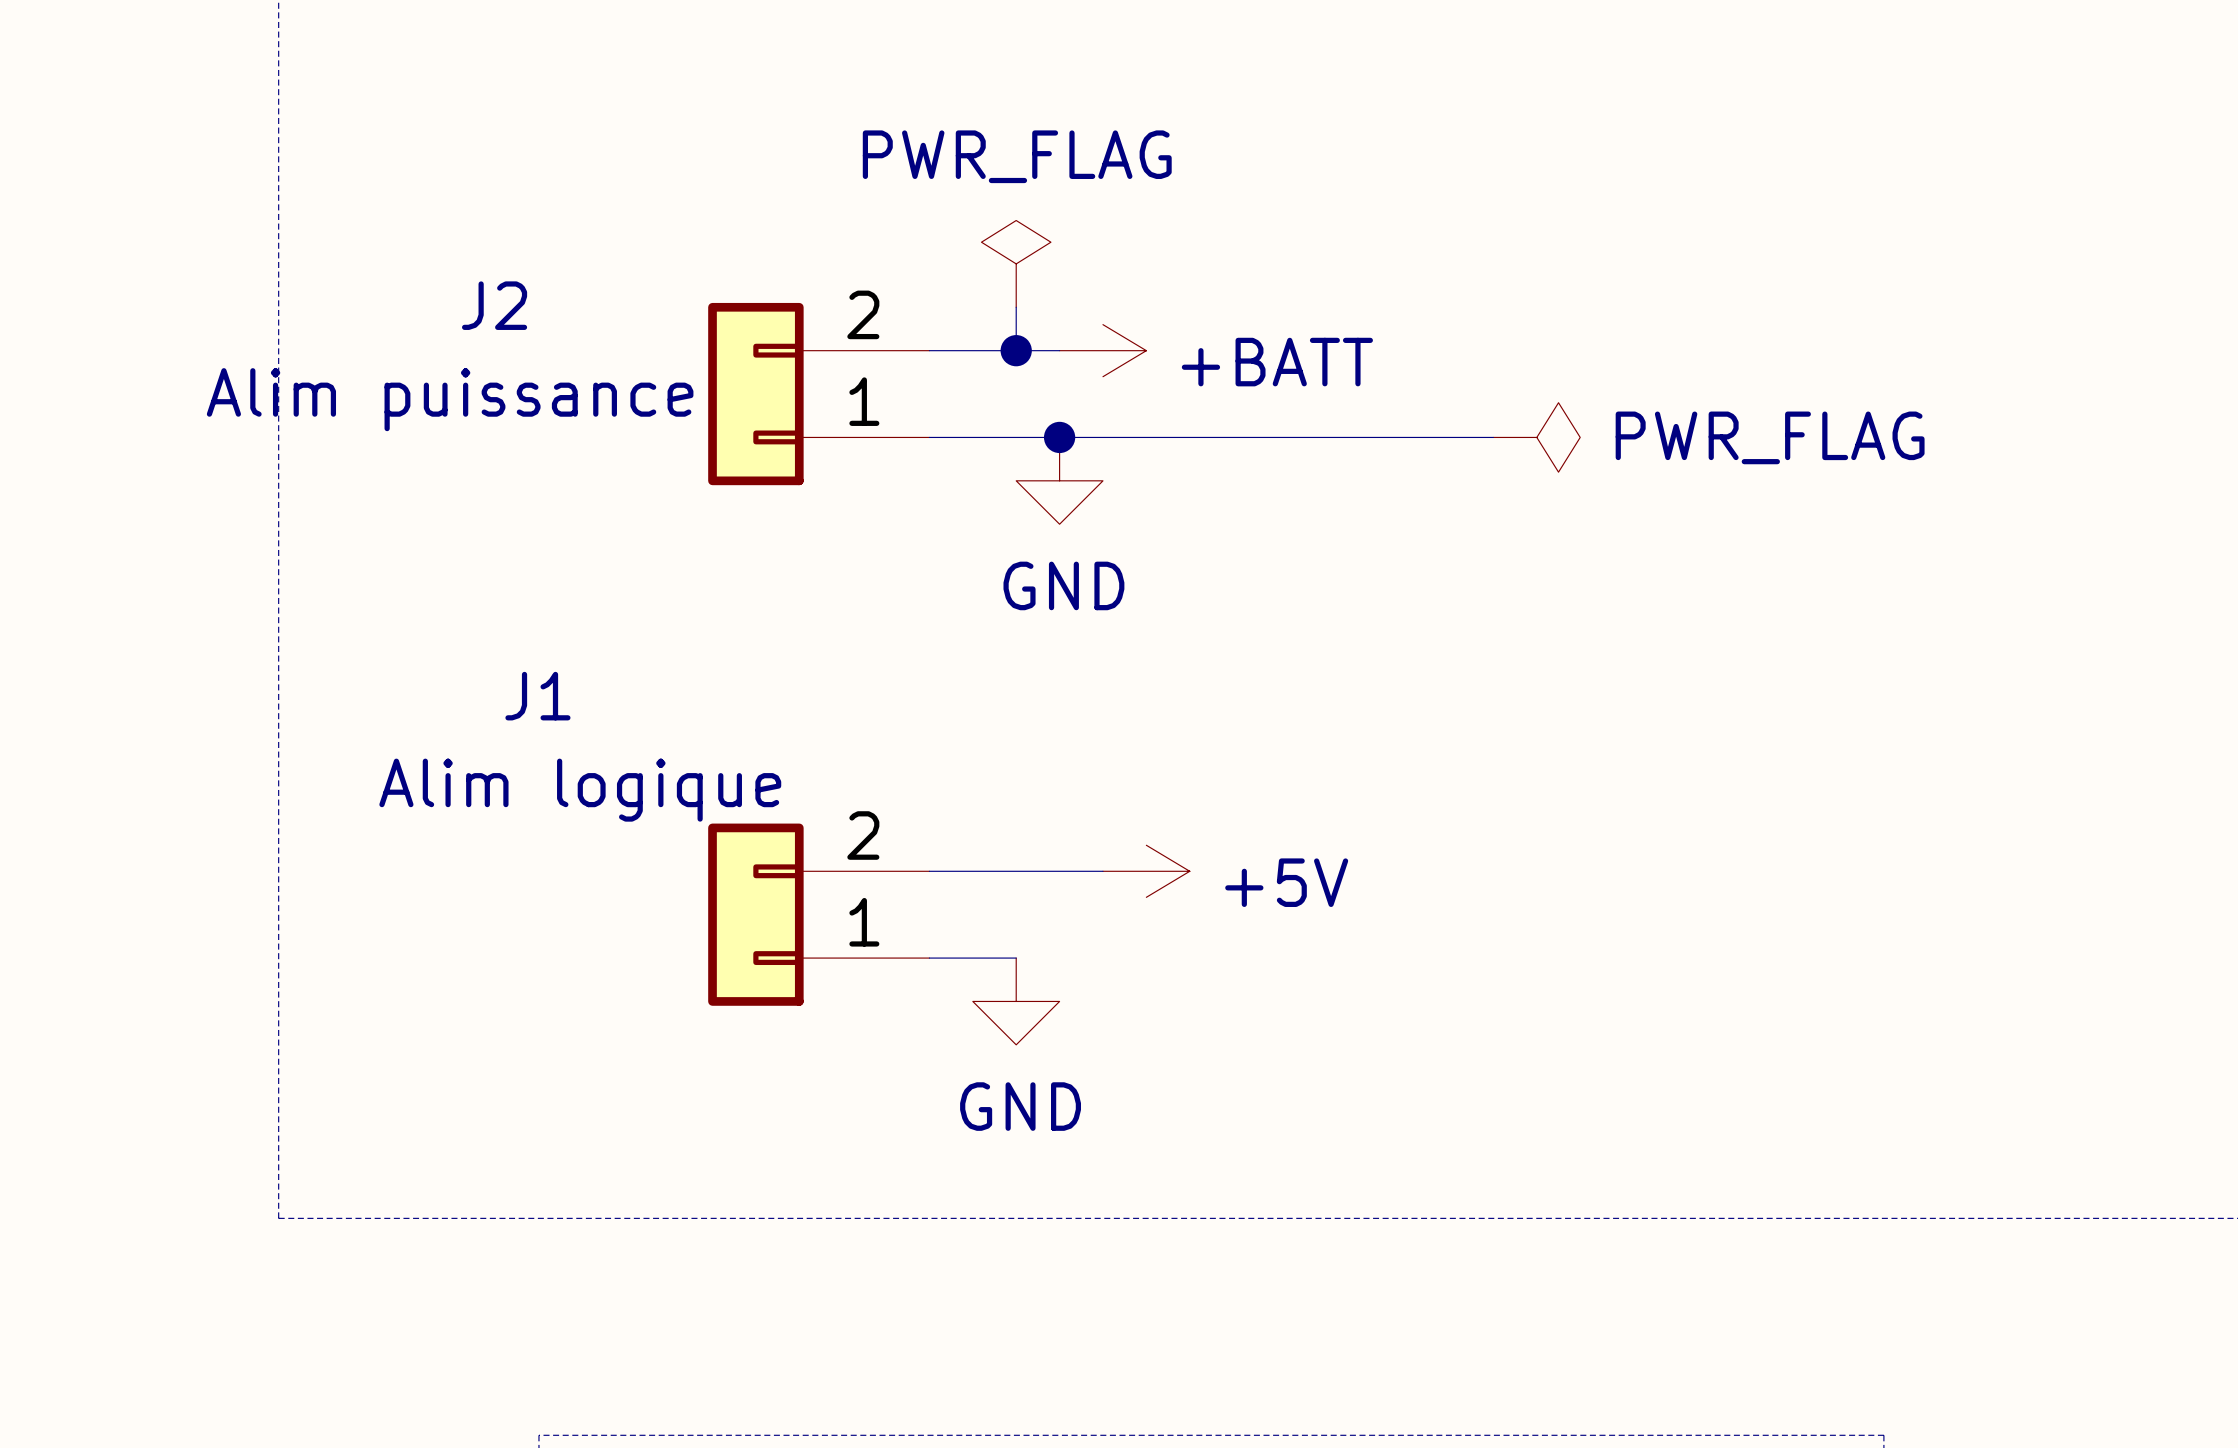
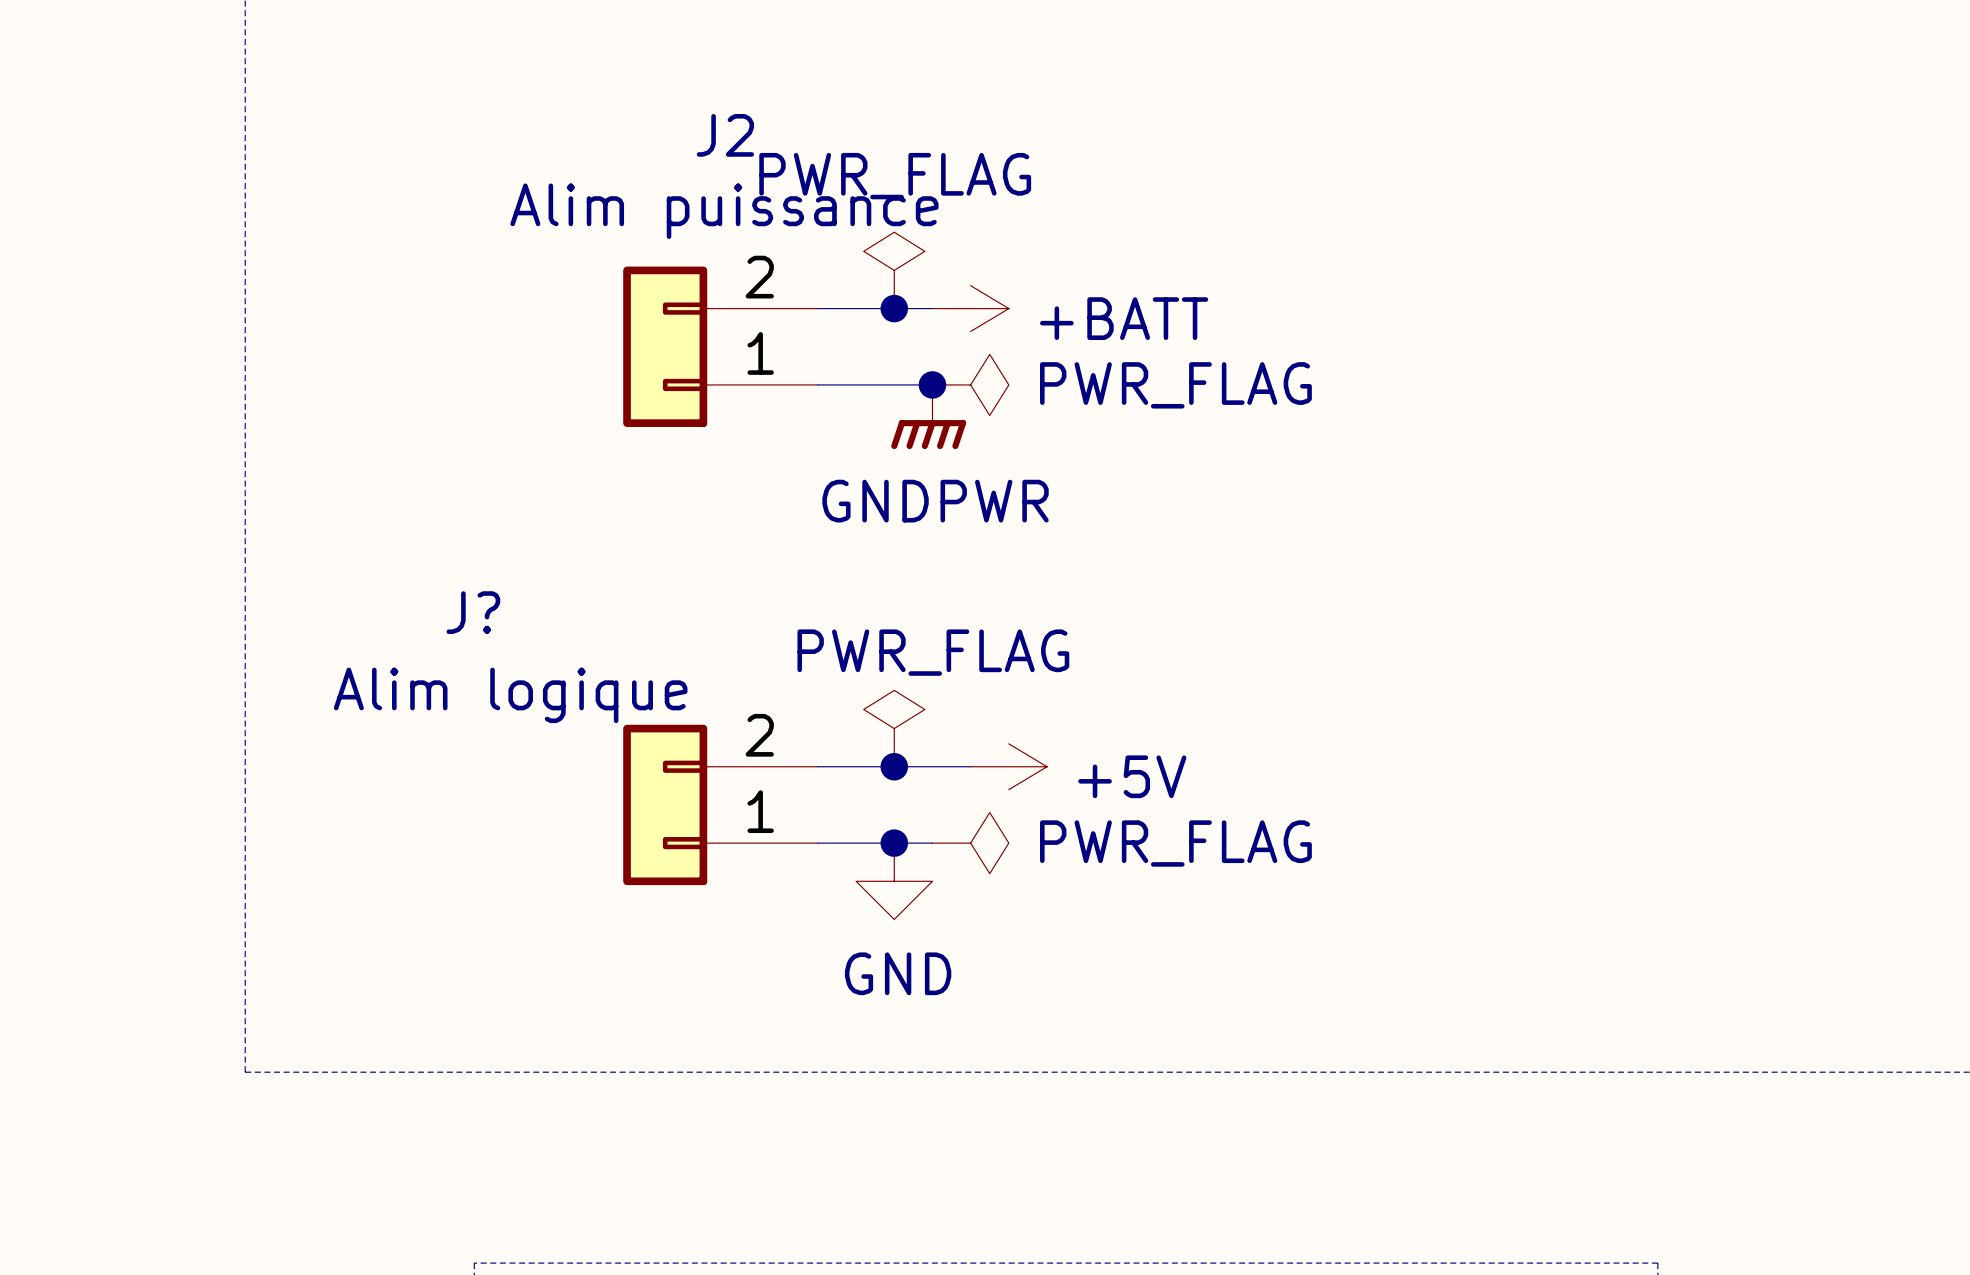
power symbol position: PWR_FLAG (1016, 263) -> PWR_FLAG (894, 270)
J2 name position: J2 (494, 305) -> J2 (725, 135)
J2 value position: Alim puissance (450, 399) -> Alim puissance (724, 211)
wire: (1059, 437) (1493, 437) -> none
power symbol: none -> PWR_FLAG (970, 384)
power symbol: PWR_FLAG (1536, 437) -> none
power symbol: GND (1059, 480) -> GNDPWR (928, 417)
J1 name: J1 (537, 696) -> J? (473, 612)
power symbol: none -> PWR_FLAG (894, 728)
junction: none -> (894, 766)
wire: none -> (894, 843) (932, 843)
junction: none -> (894, 843)
power symbol: none -> PWR_FLAG (970, 843)

